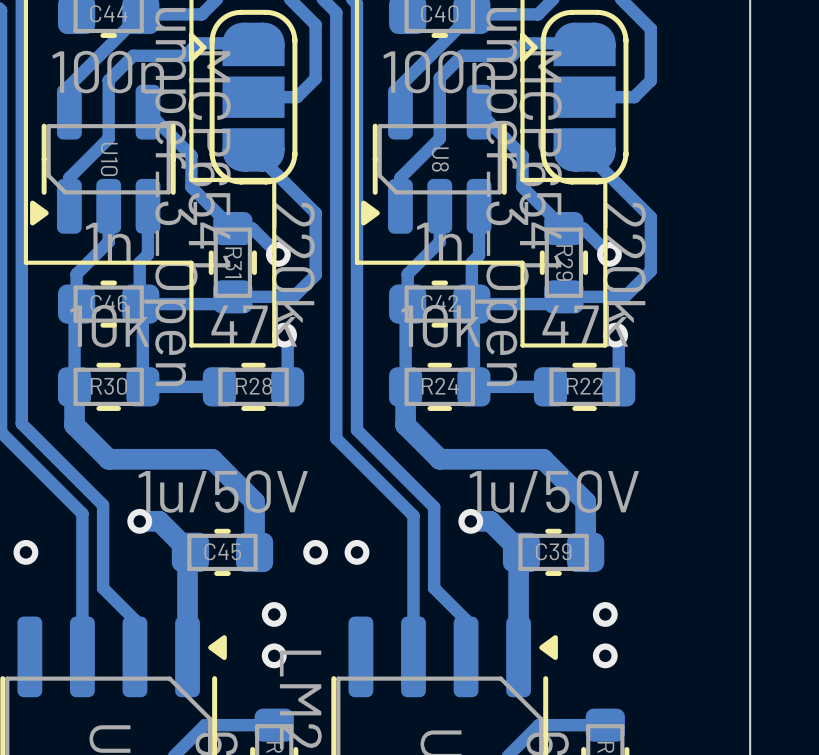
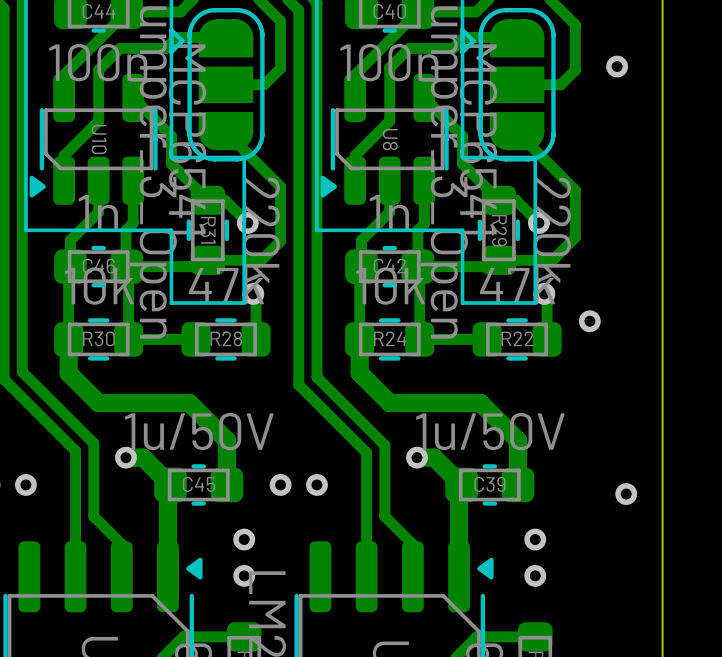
via: none -> (617, 66)
via: none -> (589, 321)
via: none -> (626, 494)

